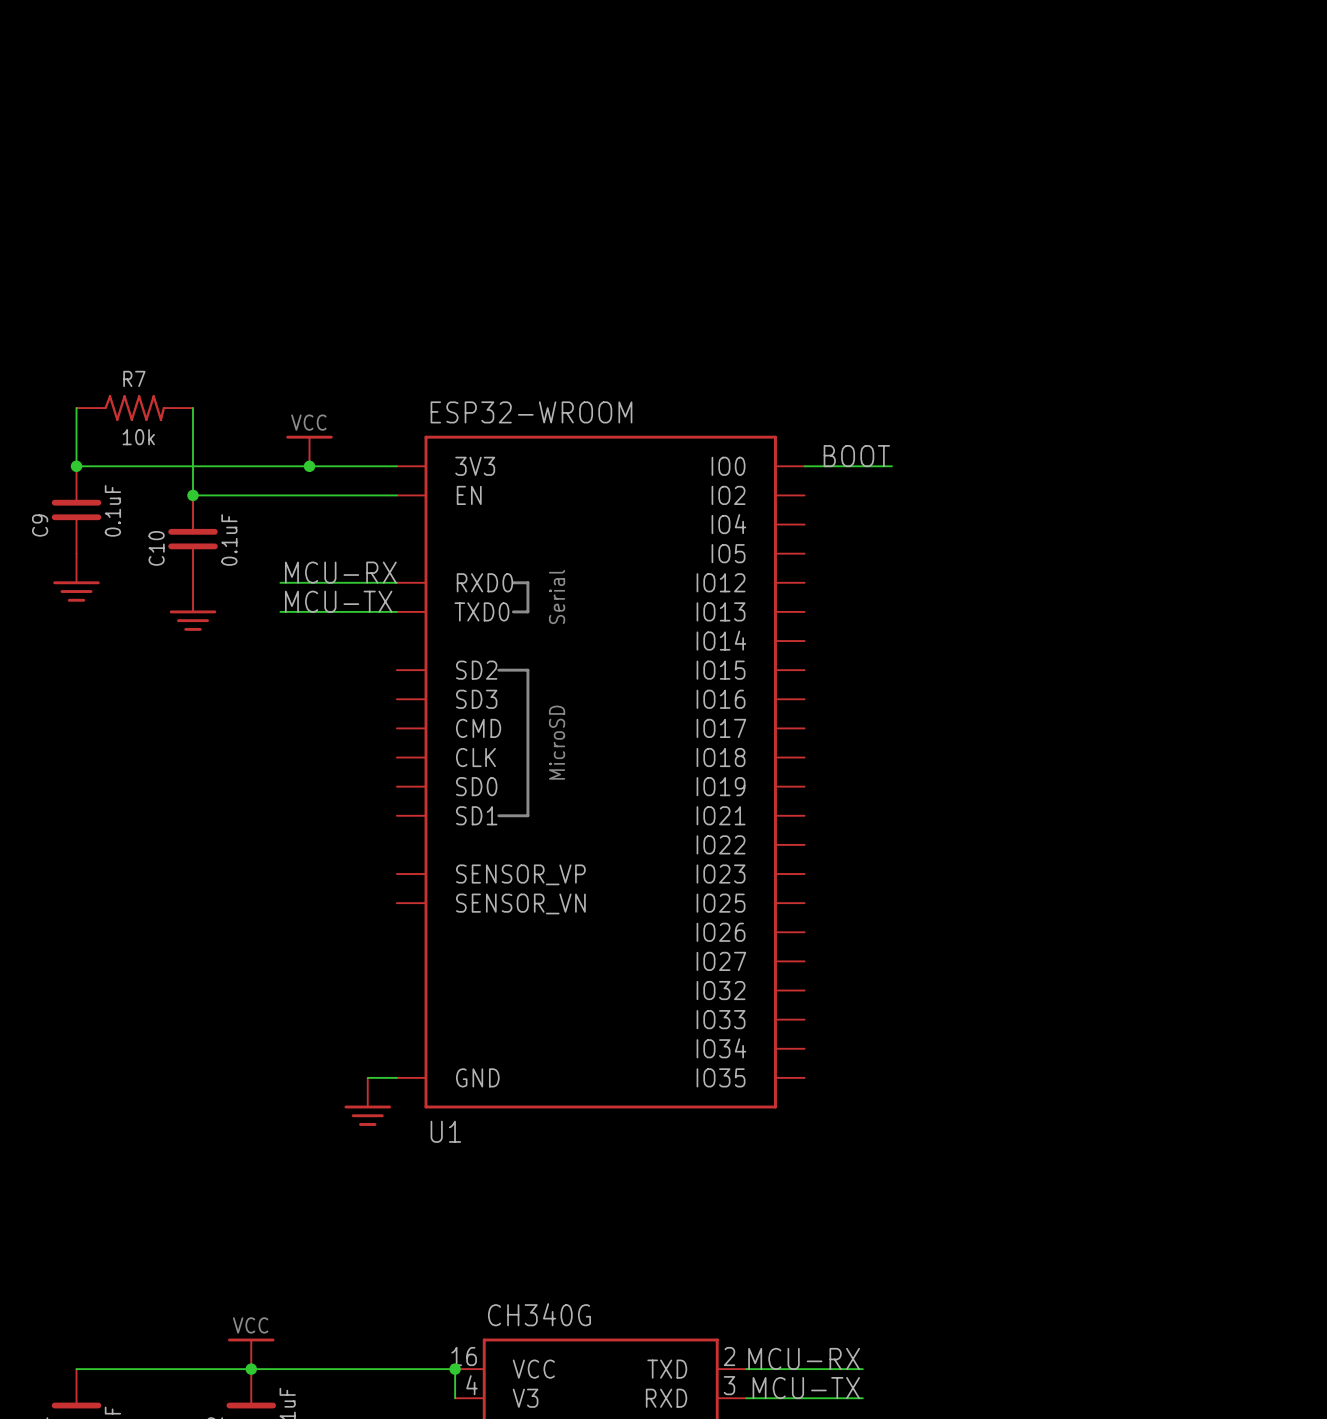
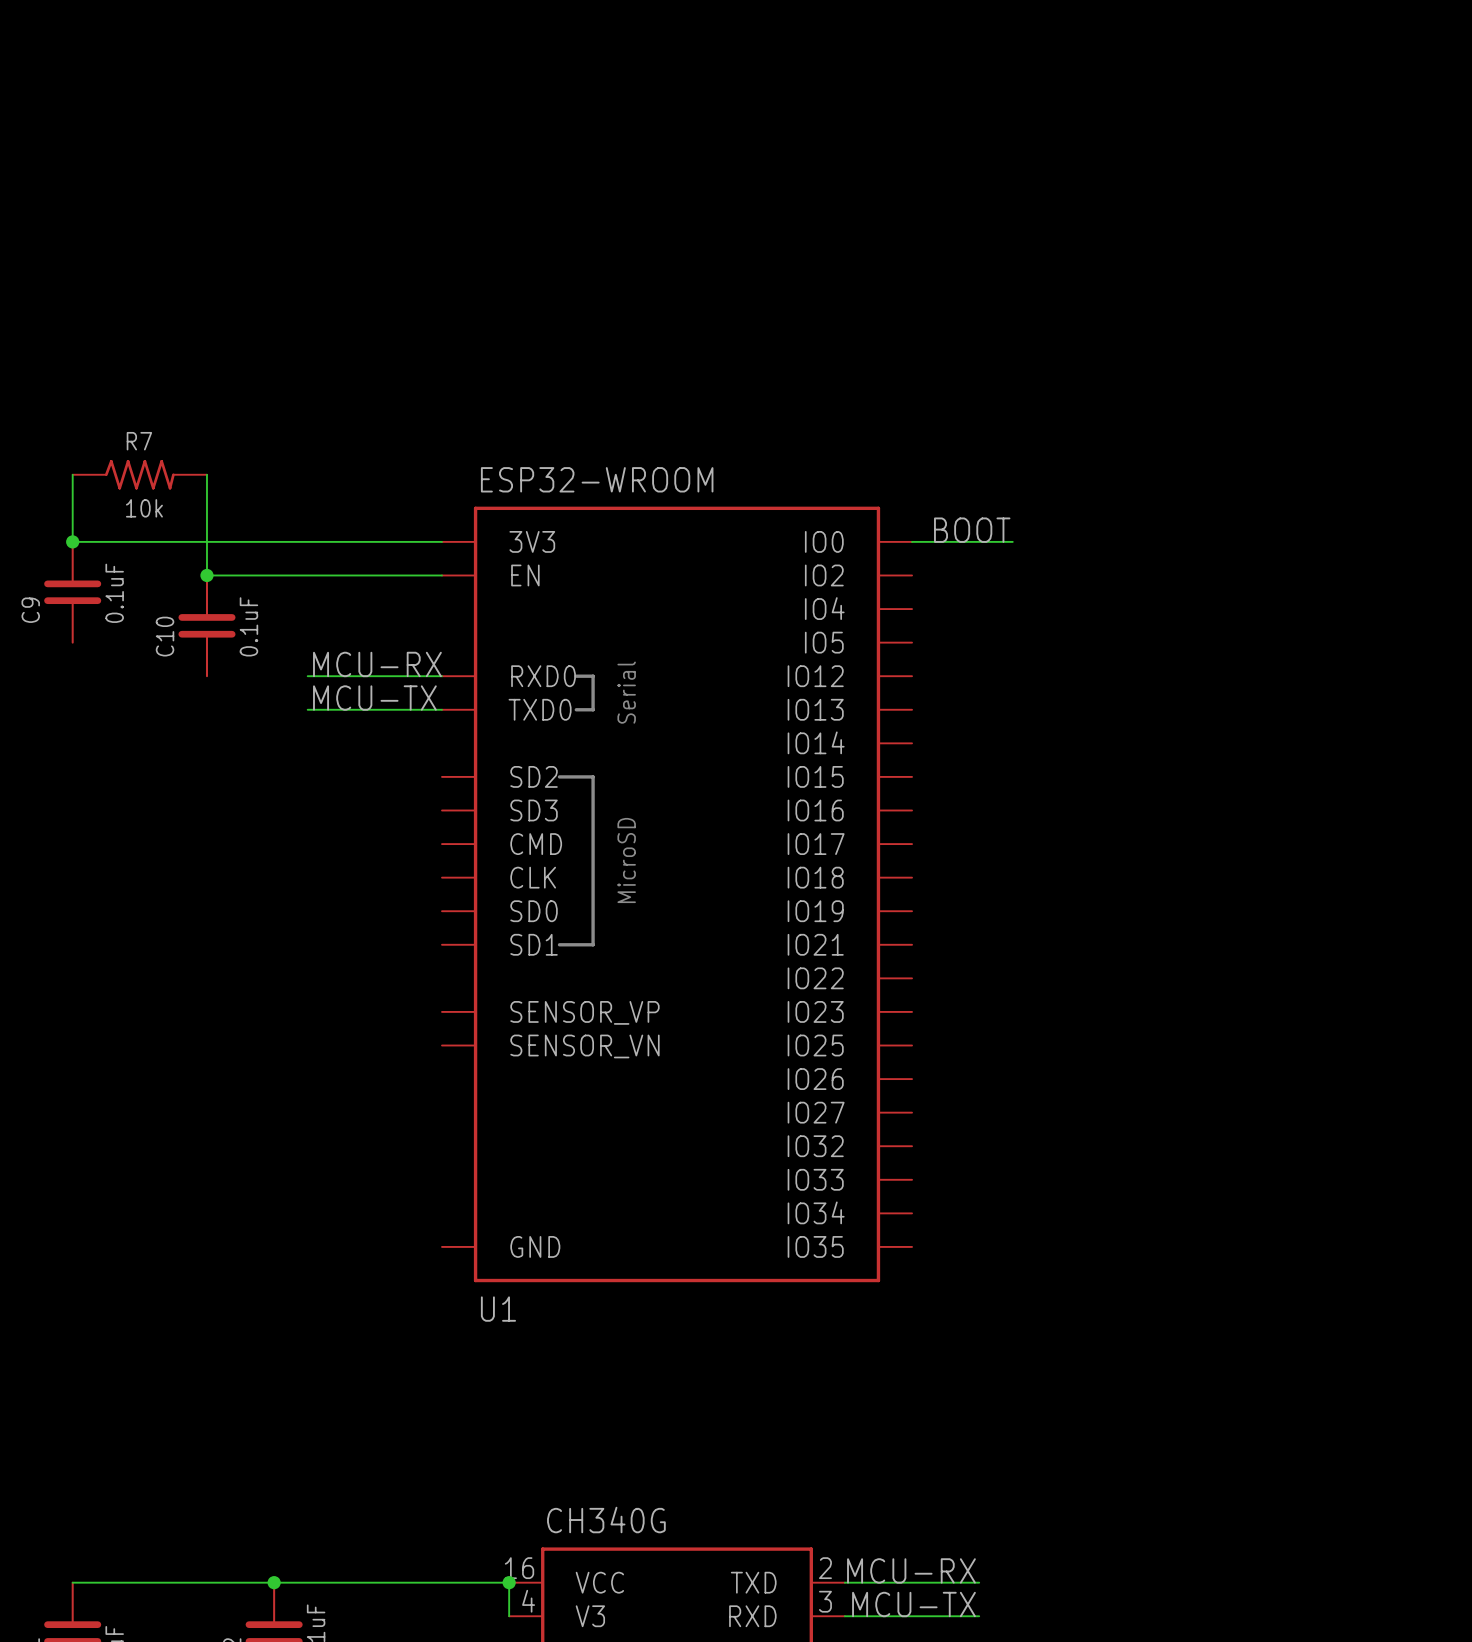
power symbol: (309, 451) -> none
junction: (309, 466) -> none
power symbol: (76, 577) -> none
power symbol: (193, 606) -> none
wire: (367, 1077) (396, 1077) -> none
power symbol: (367, 1101) -> none
power symbol: (251, 1353) -> none

